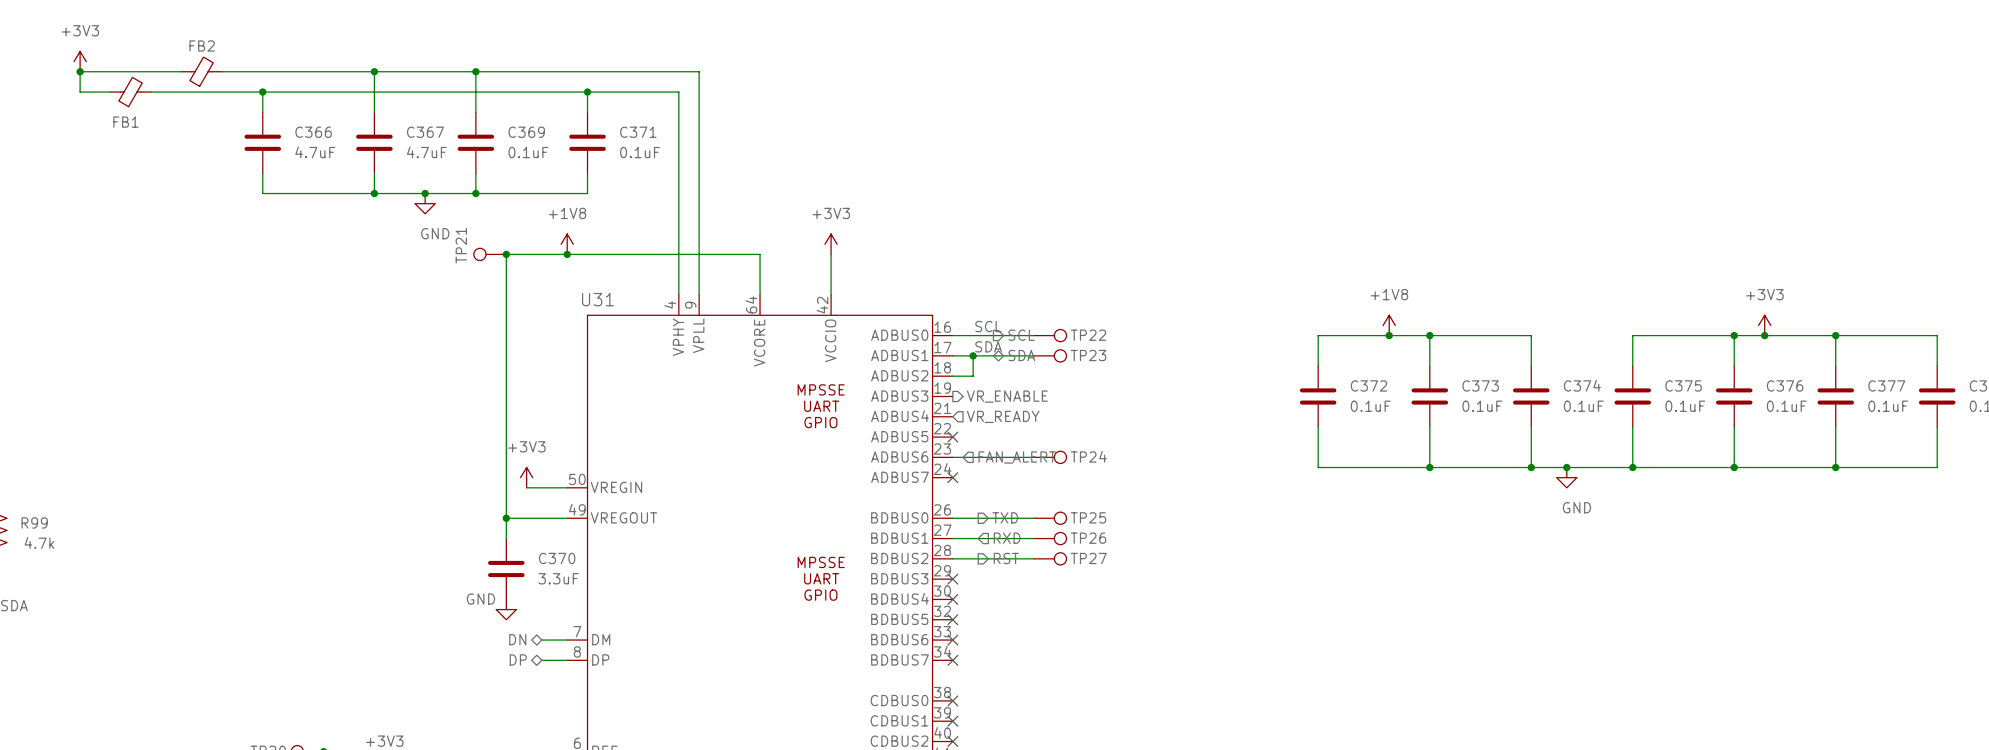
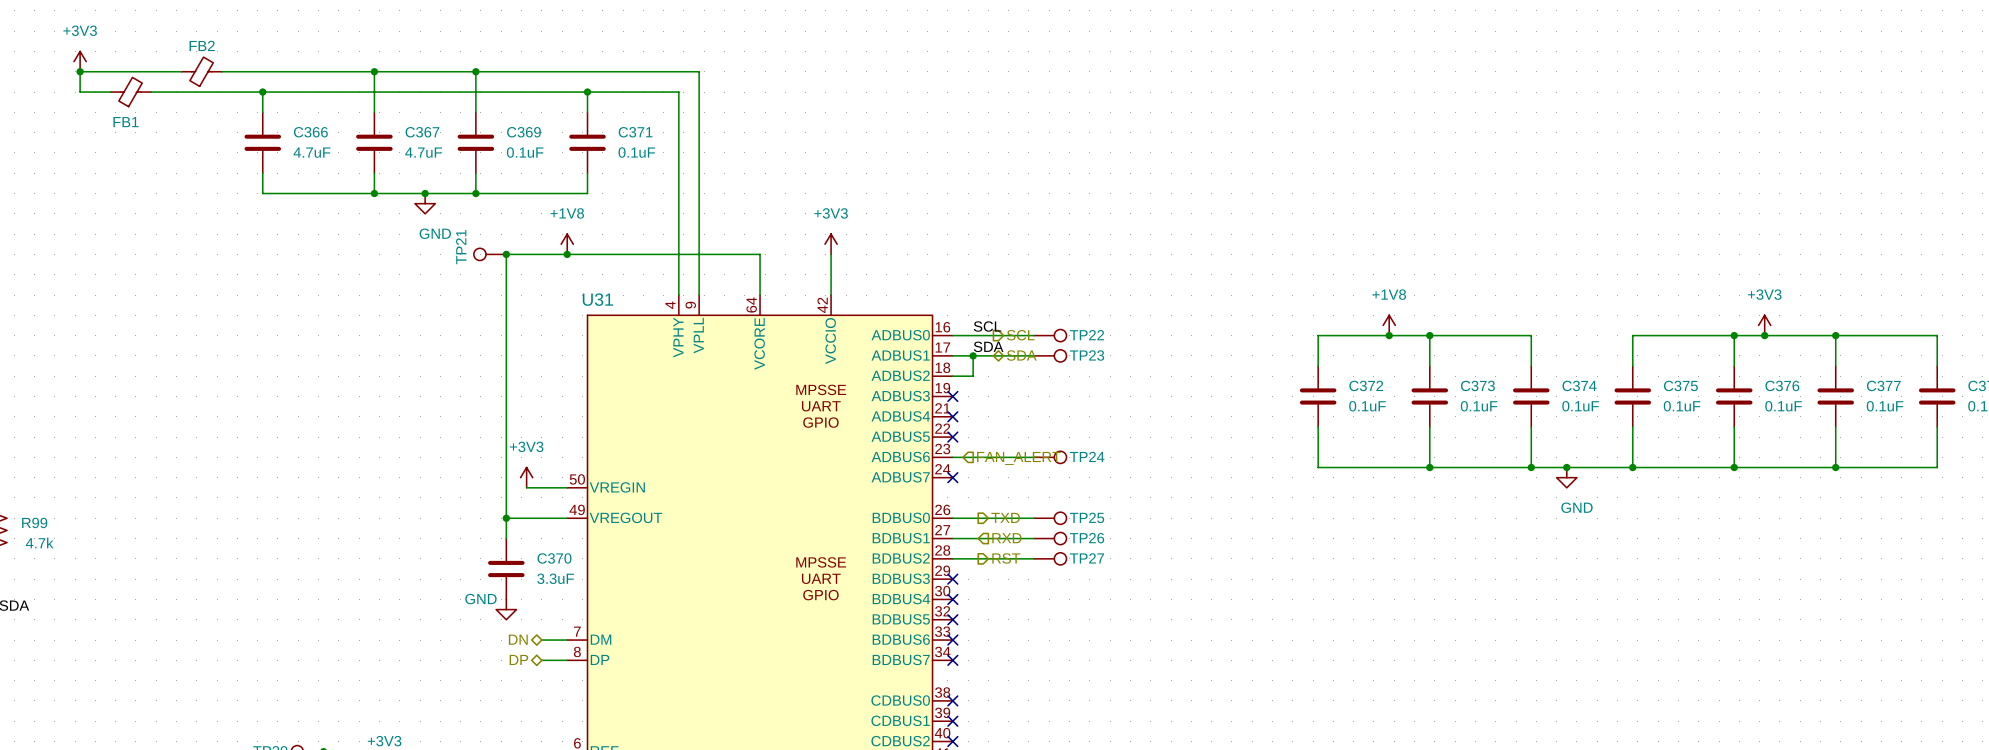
no-connect mark: none -> (952, 396)
hierarchical label: VR_ENABLE (1007, 396) -> none
no-connect mark: none -> (952, 416)
hierarchical label: VR_READY (1003, 416) -> none

